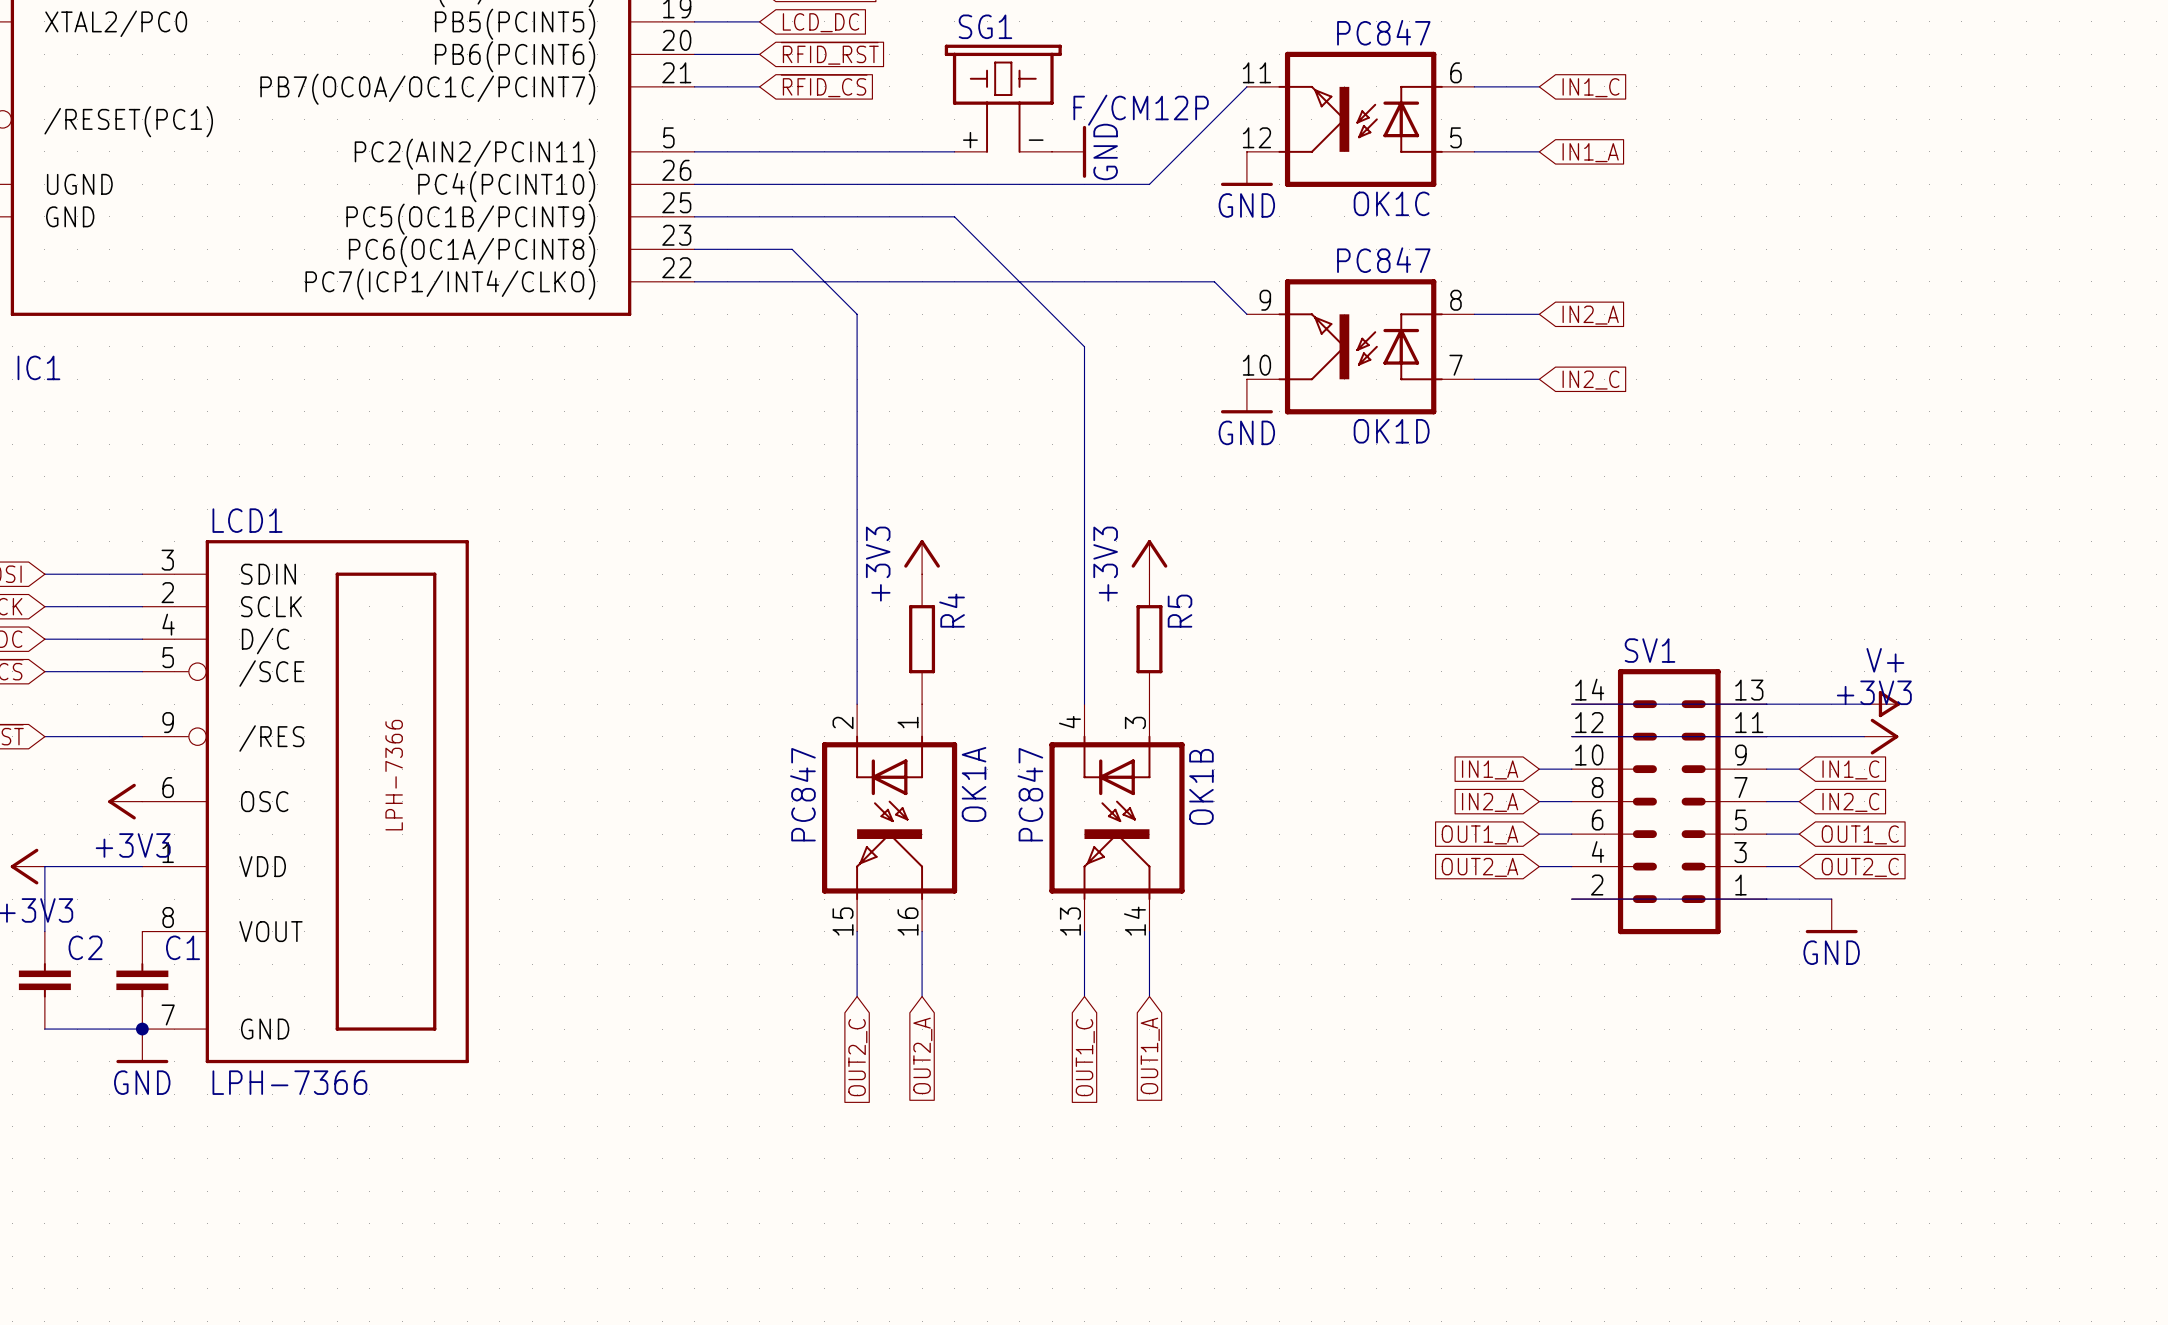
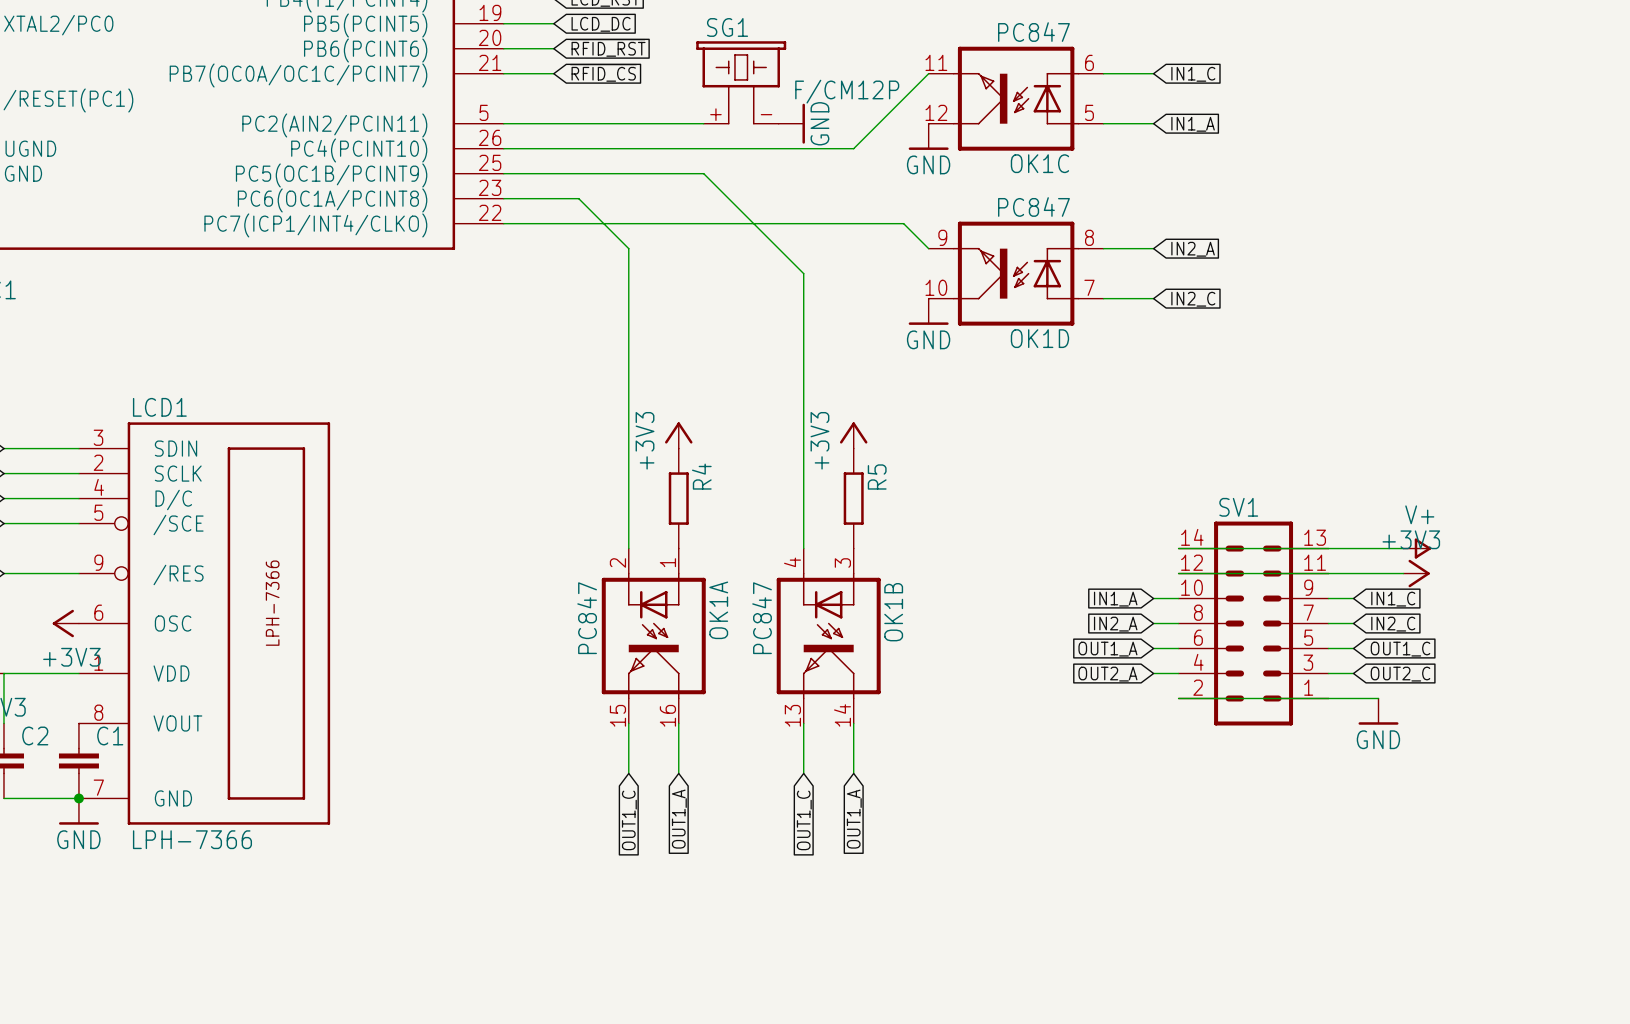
global label: OUT2_A (922, 1055) -> OUT1_A (679, 819)
global label: OUT2_C (857, 1057) -> OUT1_C (629, 820)

